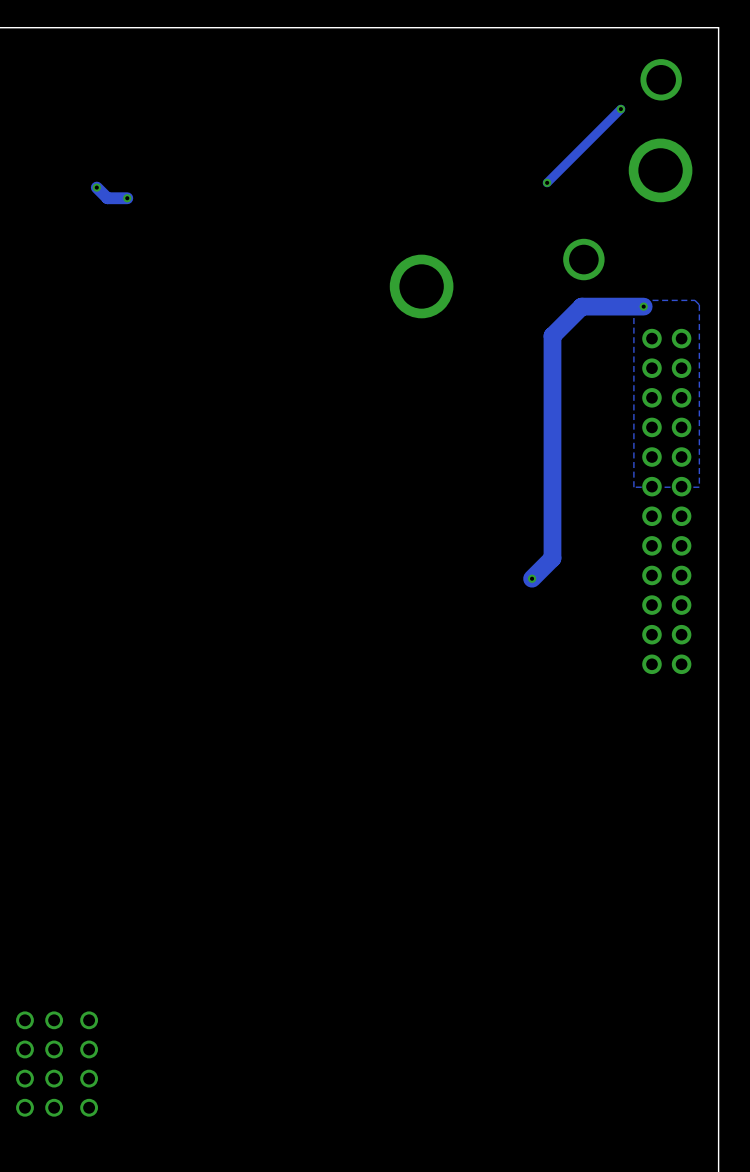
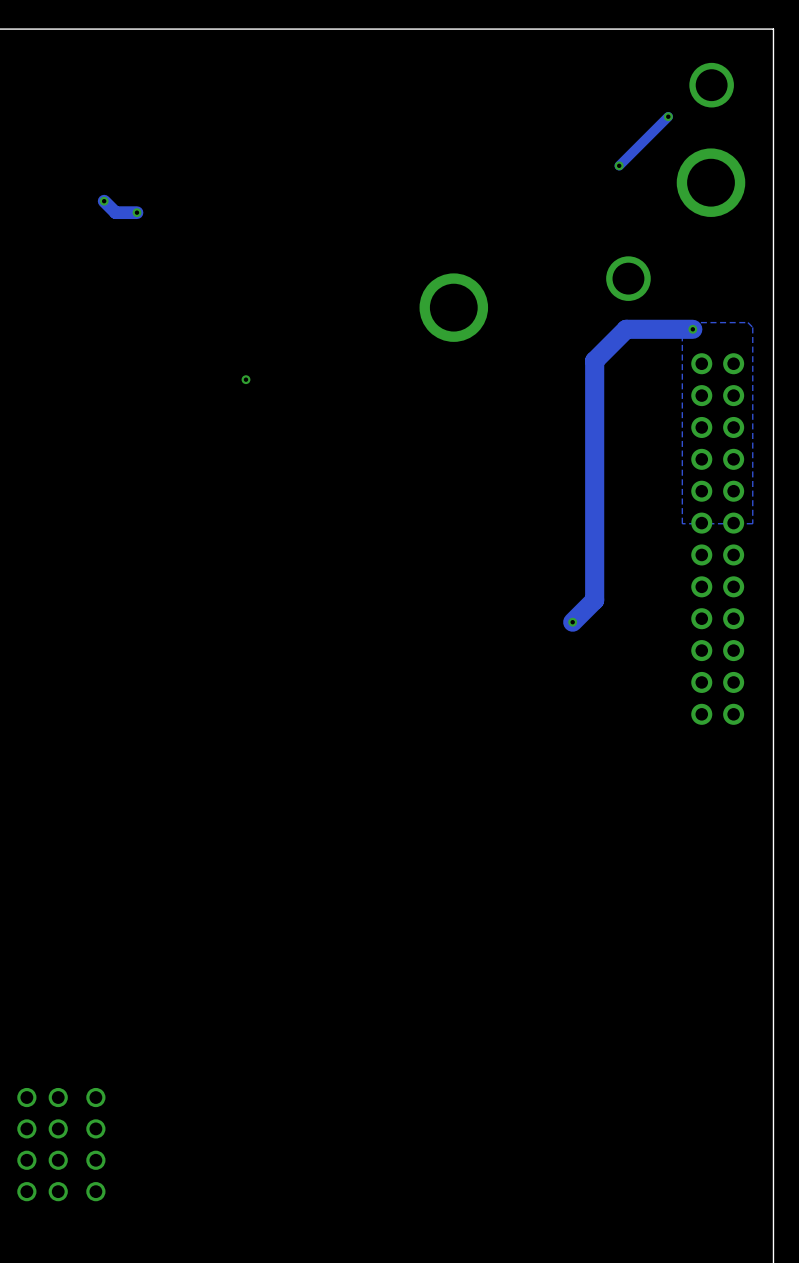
track: (575, 154) (547, 182) -> none
via position: (547, 182) -> (619, 165)
via: none -> (245, 379)

